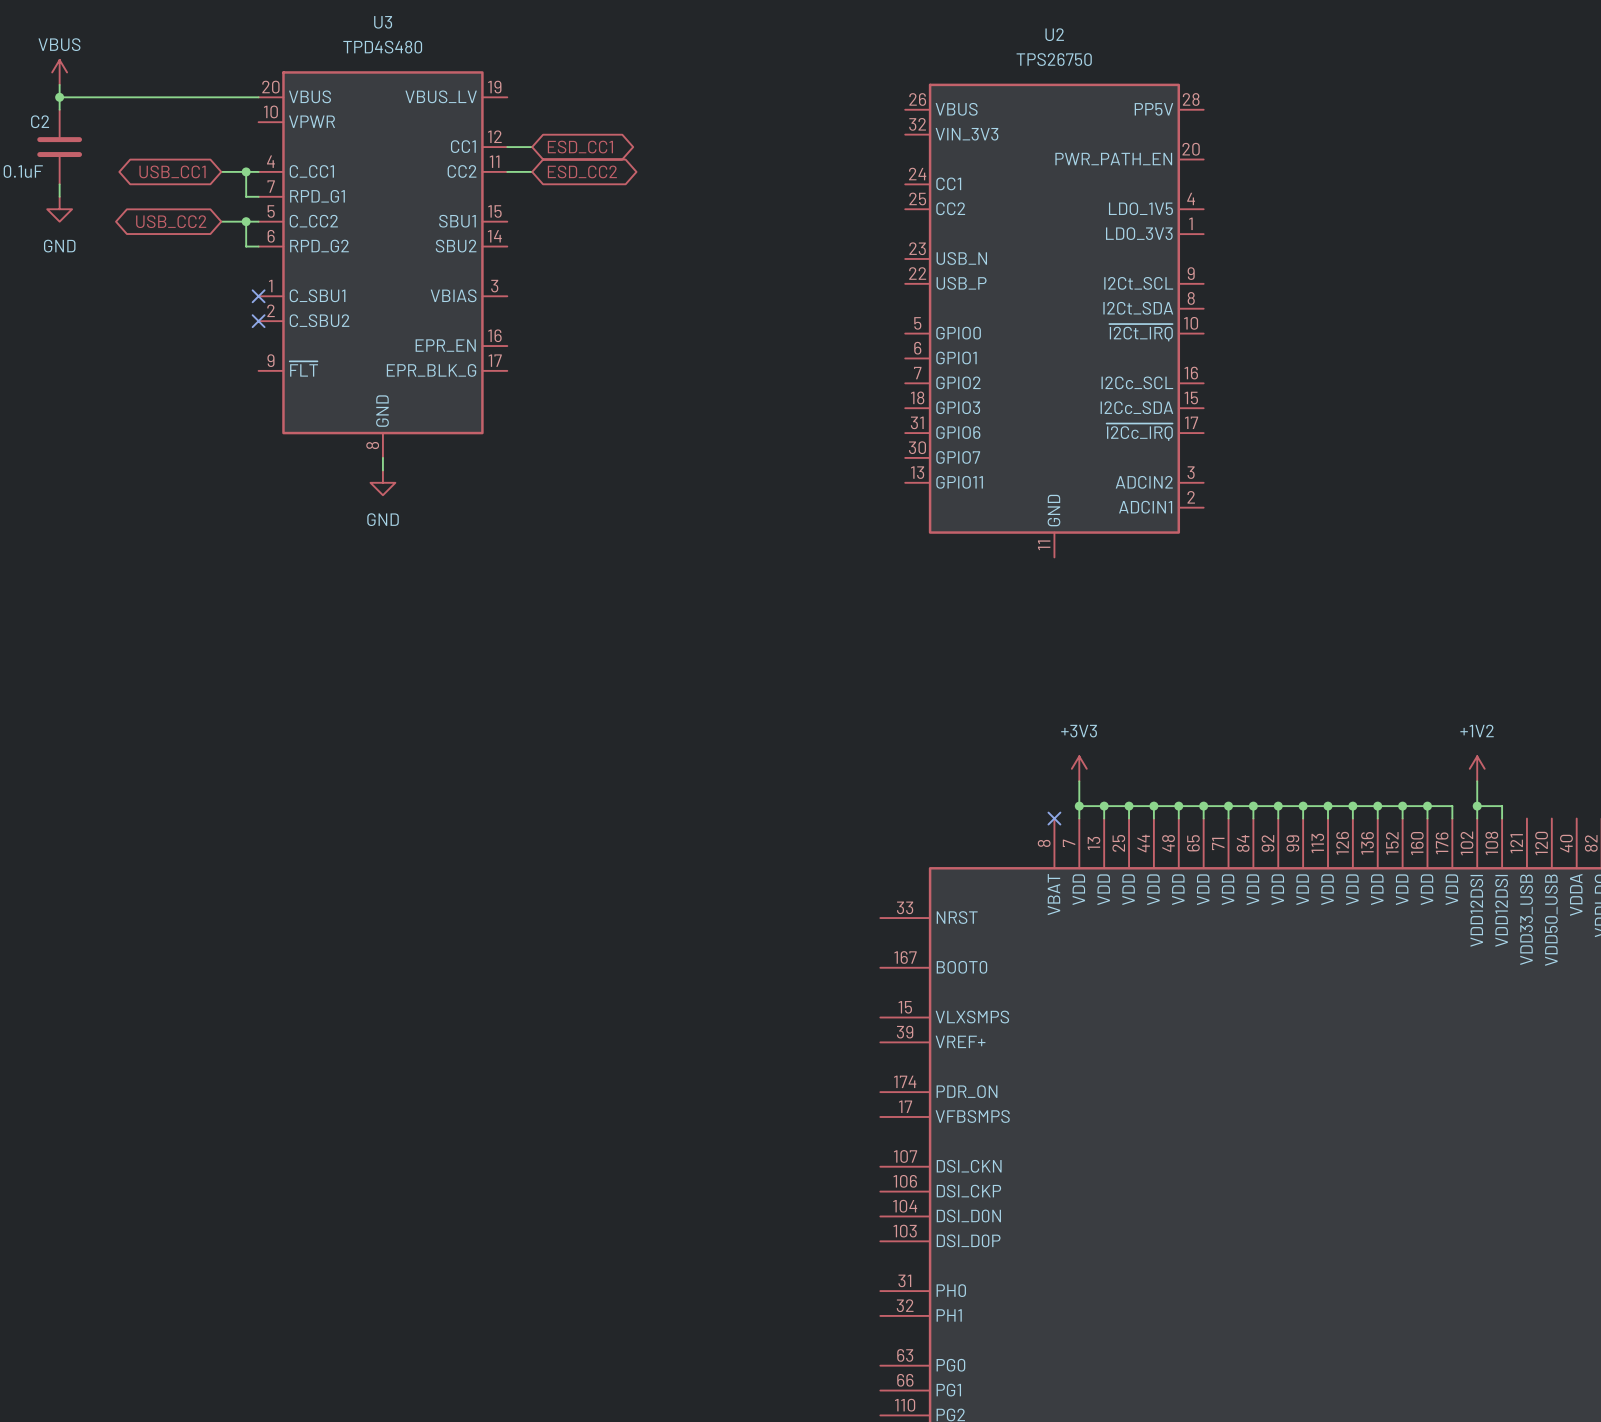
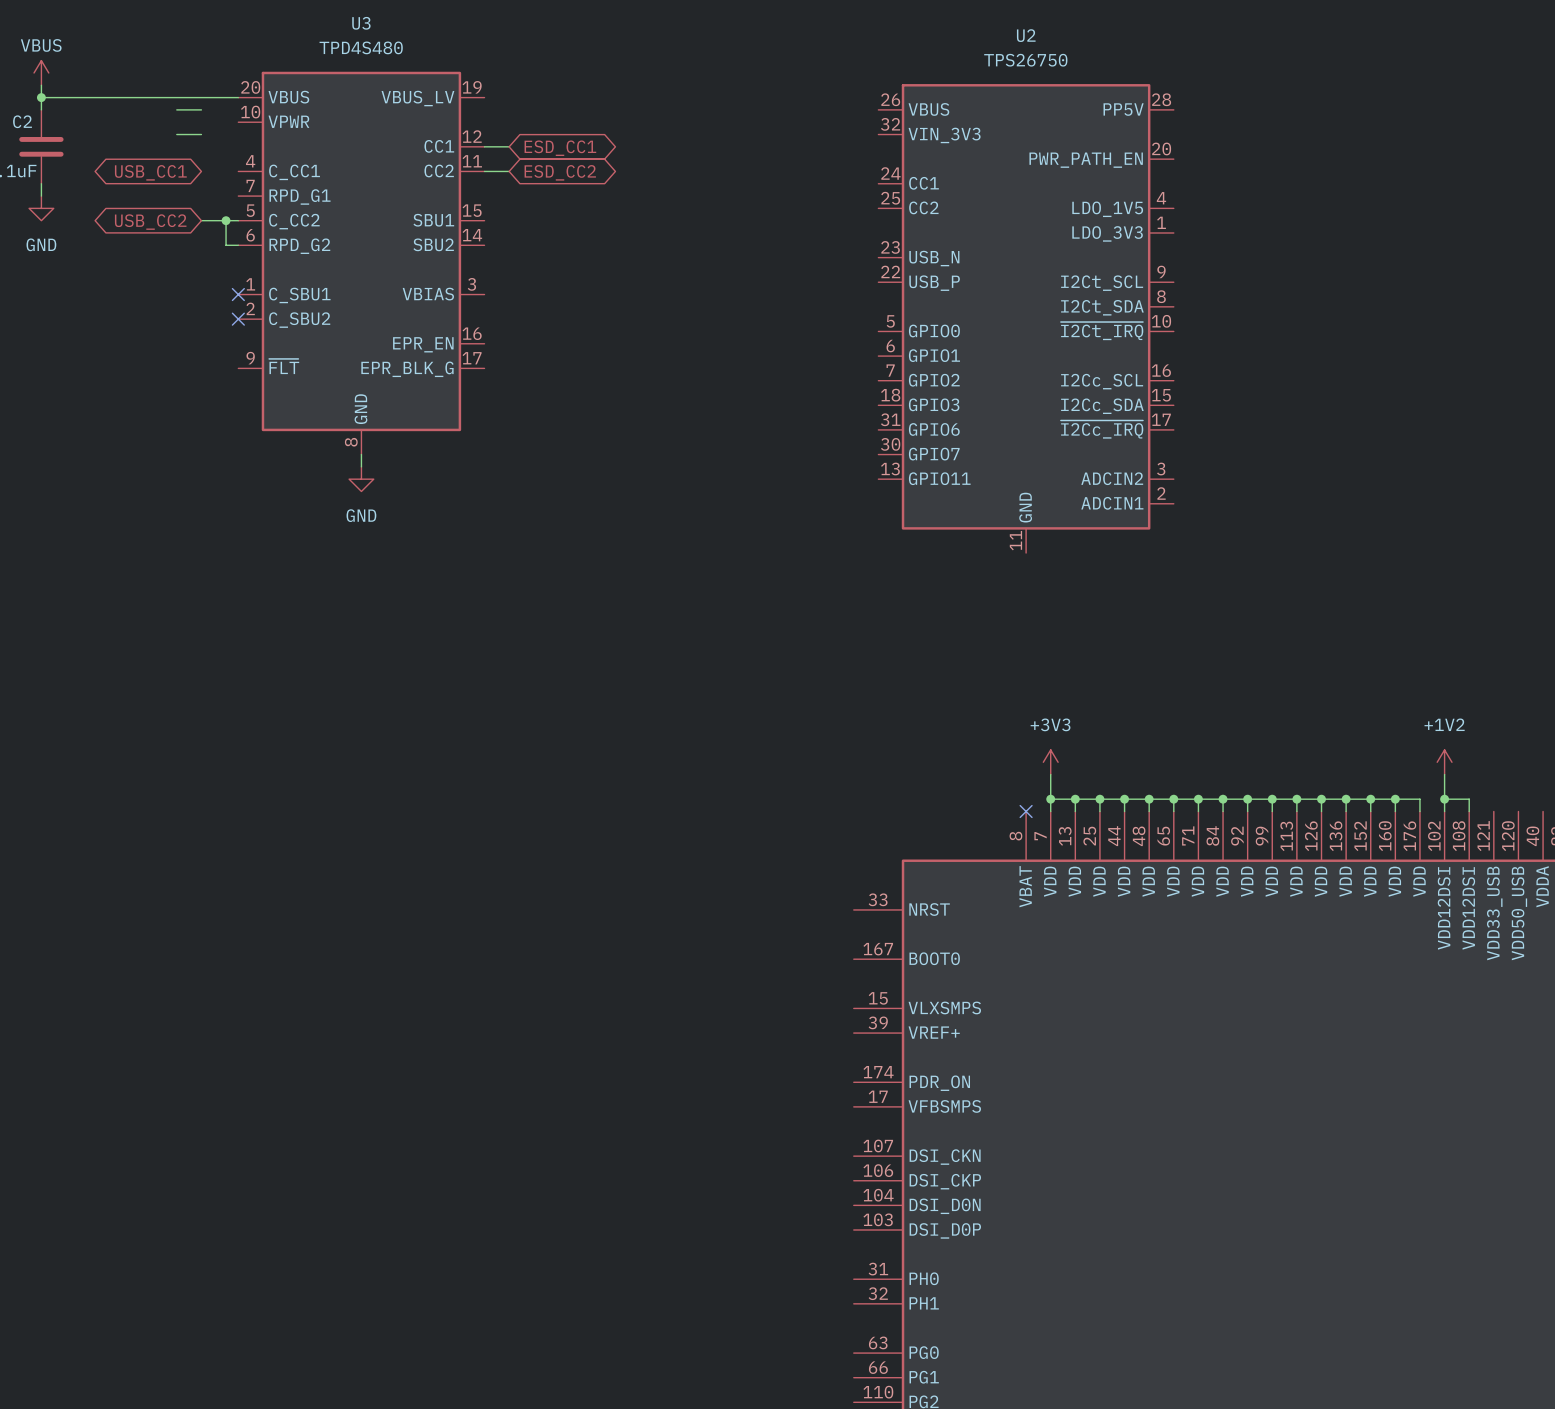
wire: none -> (176, 109) (201, 109)
wire: none -> (176, 134) (201, 134)
wire: (221, 171) (258, 171) -> none
wire: (246, 171) (246, 196) (258, 196) -> none
junction: (246, 171) -> none

